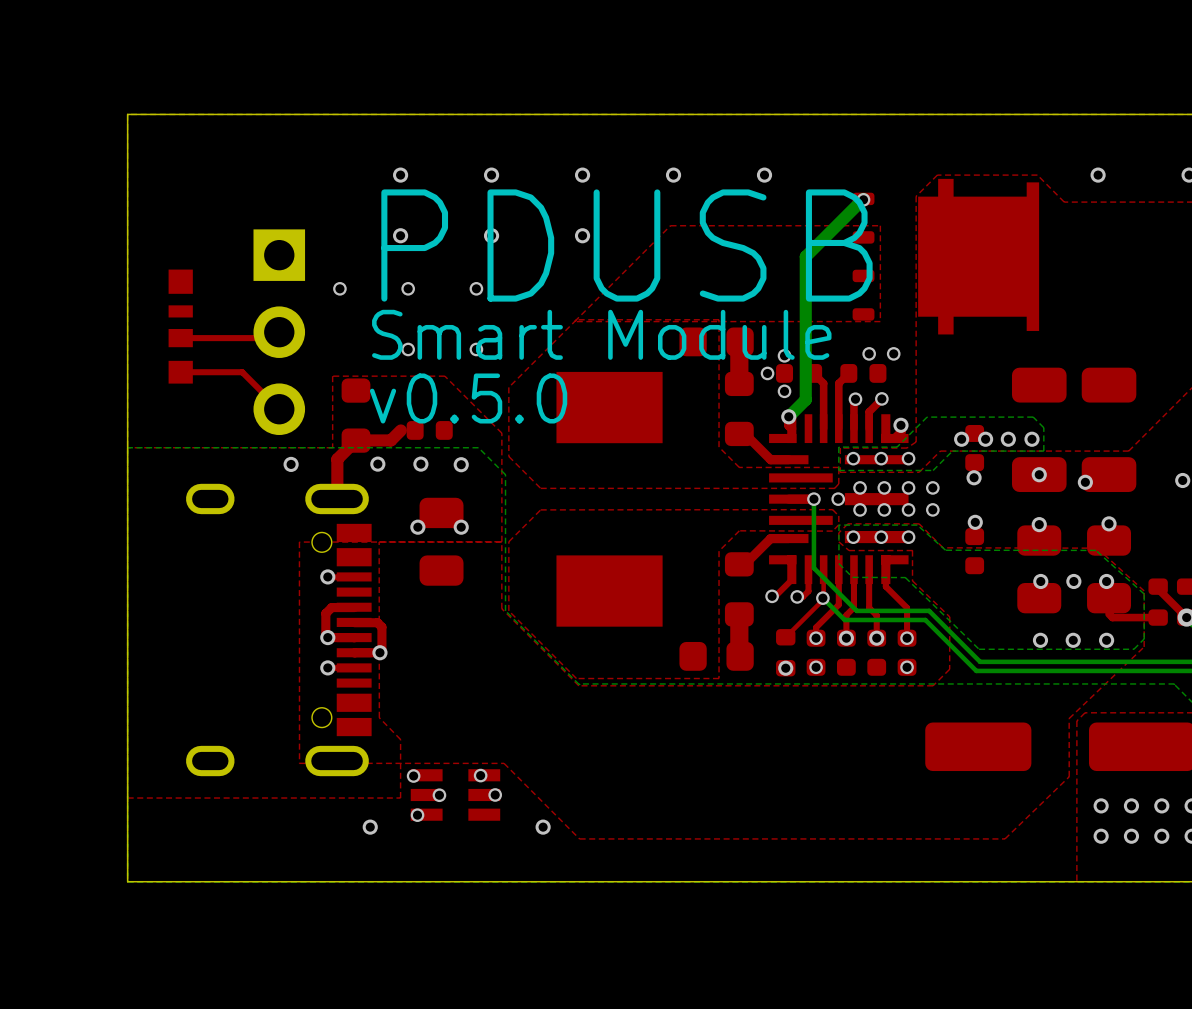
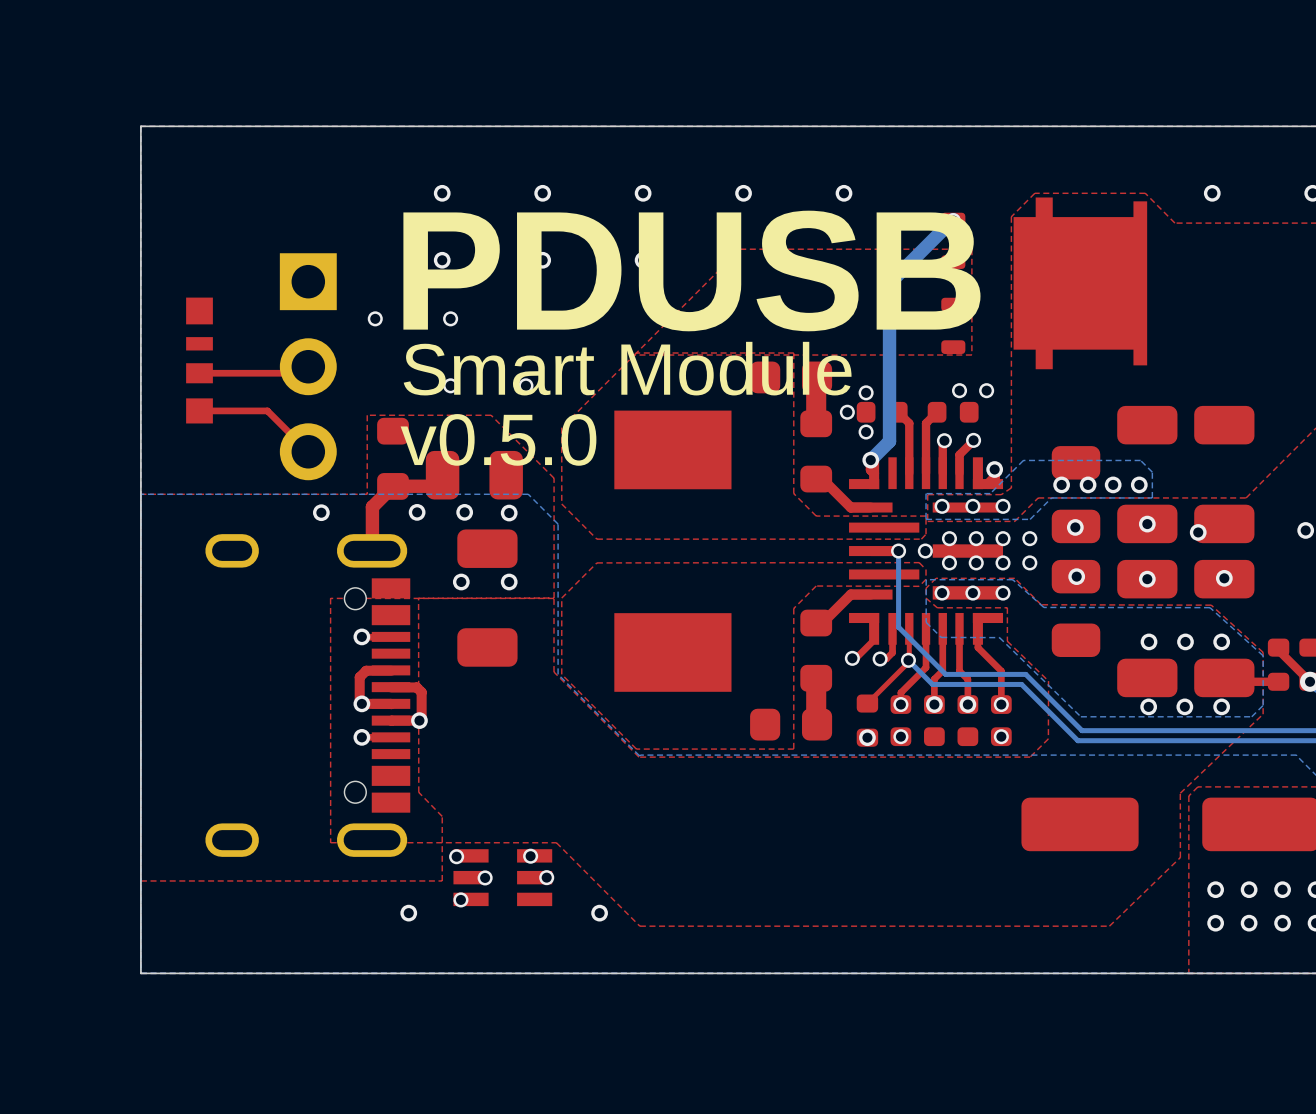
part footprint: [406, 421, 453, 440] -> [425, 450, 523, 500]
part footprint: [965, 424, 985, 472] -> [1051, 446, 1101, 544]
part footprint: [419, 497, 464, 586] -> [457, 529, 518, 667]
part footprint: [1017, 525, 1062, 614] -> [1117, 559, 1178, 698]
part footprint: [1087, 525, 1132, 614] -> [1194, 559, 1255, 698]
part footprint: [965, 528, 985, 575] -> [1051, 559, 1101, 658]

